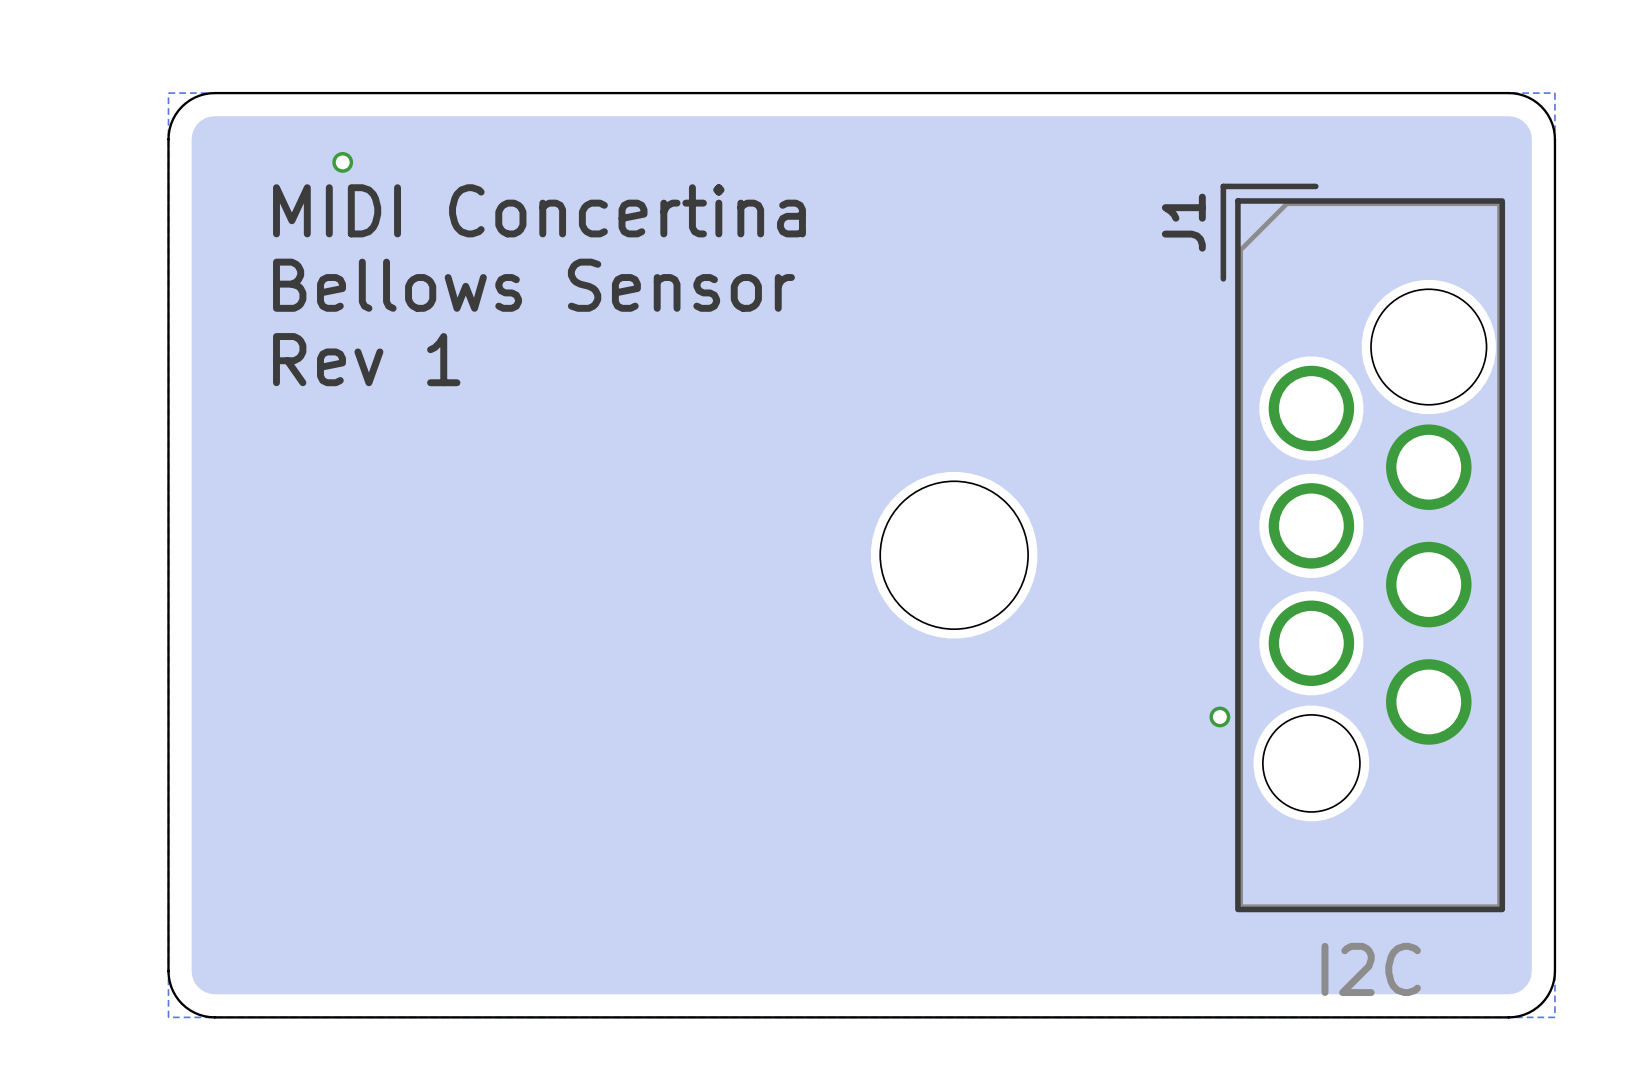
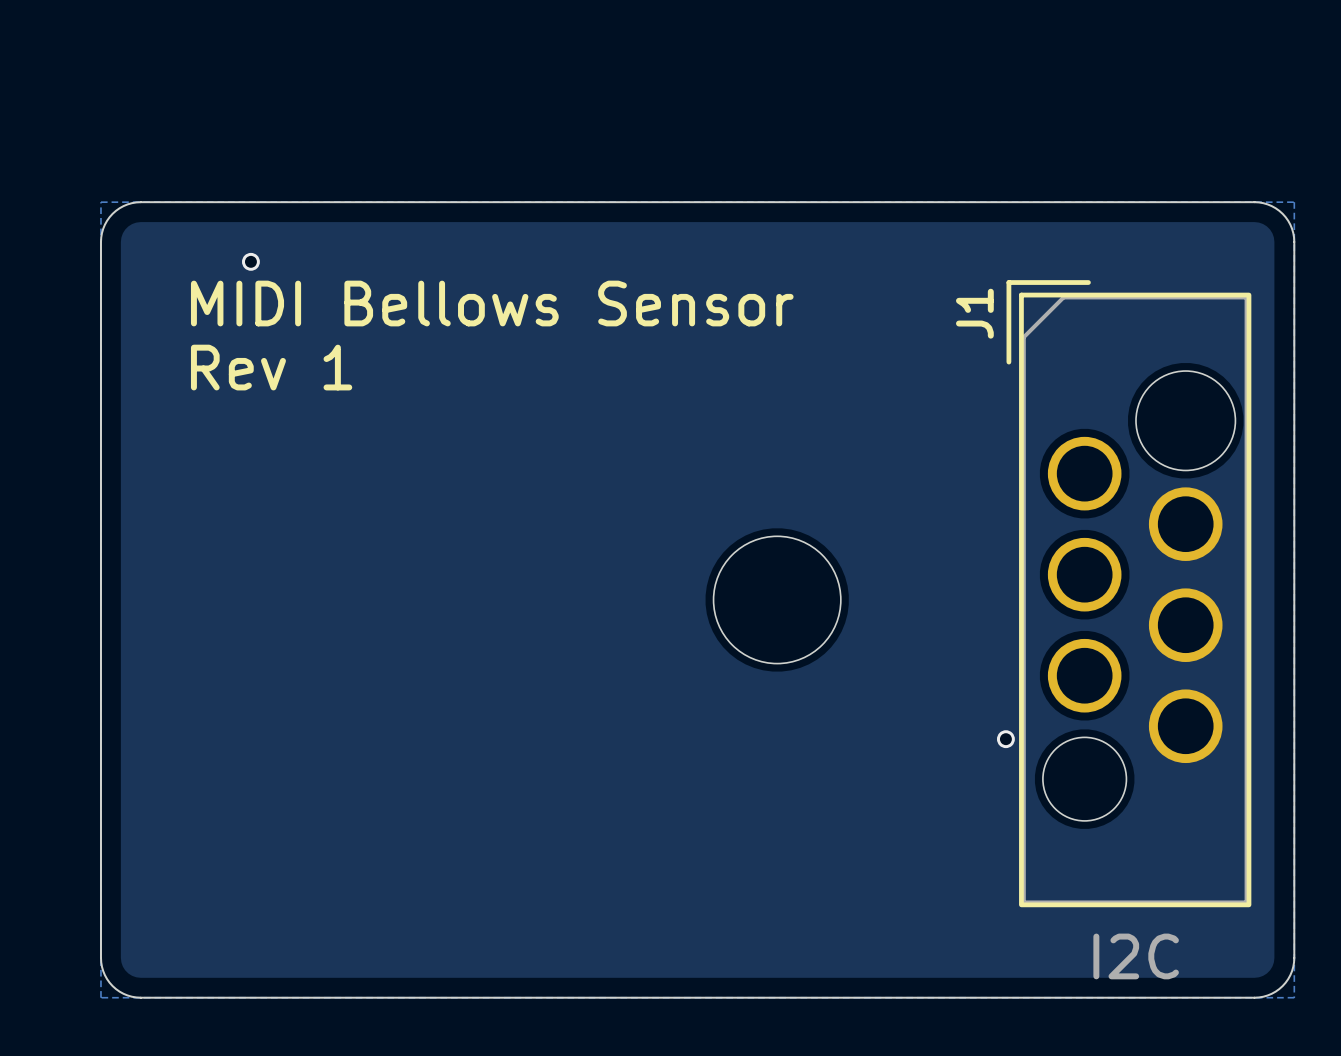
text: MIDI Concertina (539, 210) -> MIDI Bellows Sensor (492, 303)
text: Bellows Sensor (533, 285) -> Rev 1 (271, 367)
text: Rev 1 (366, 359) -> none

